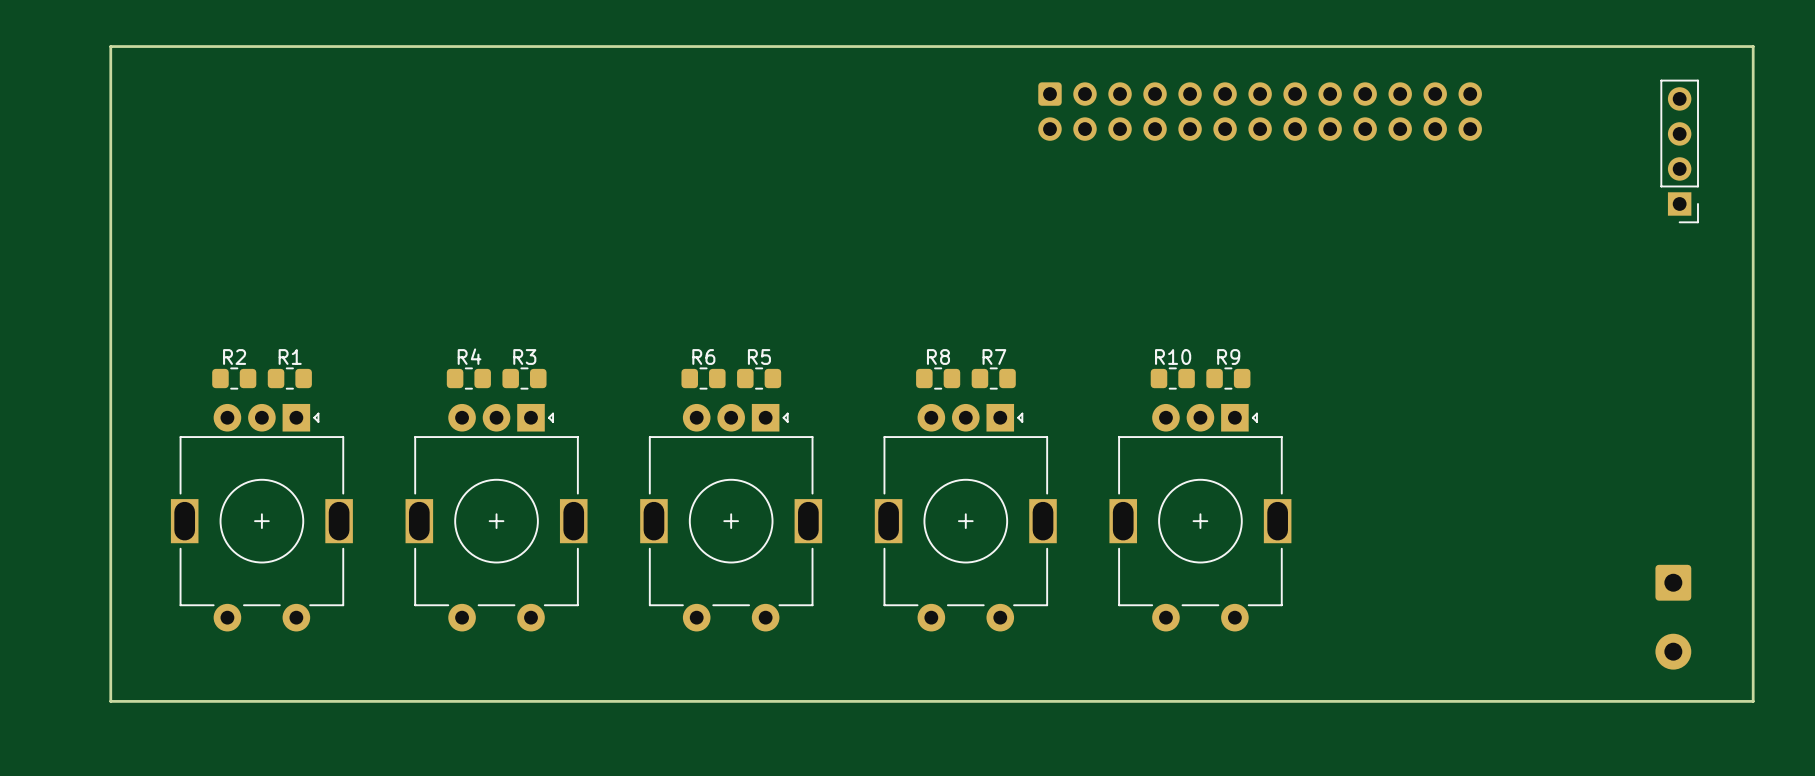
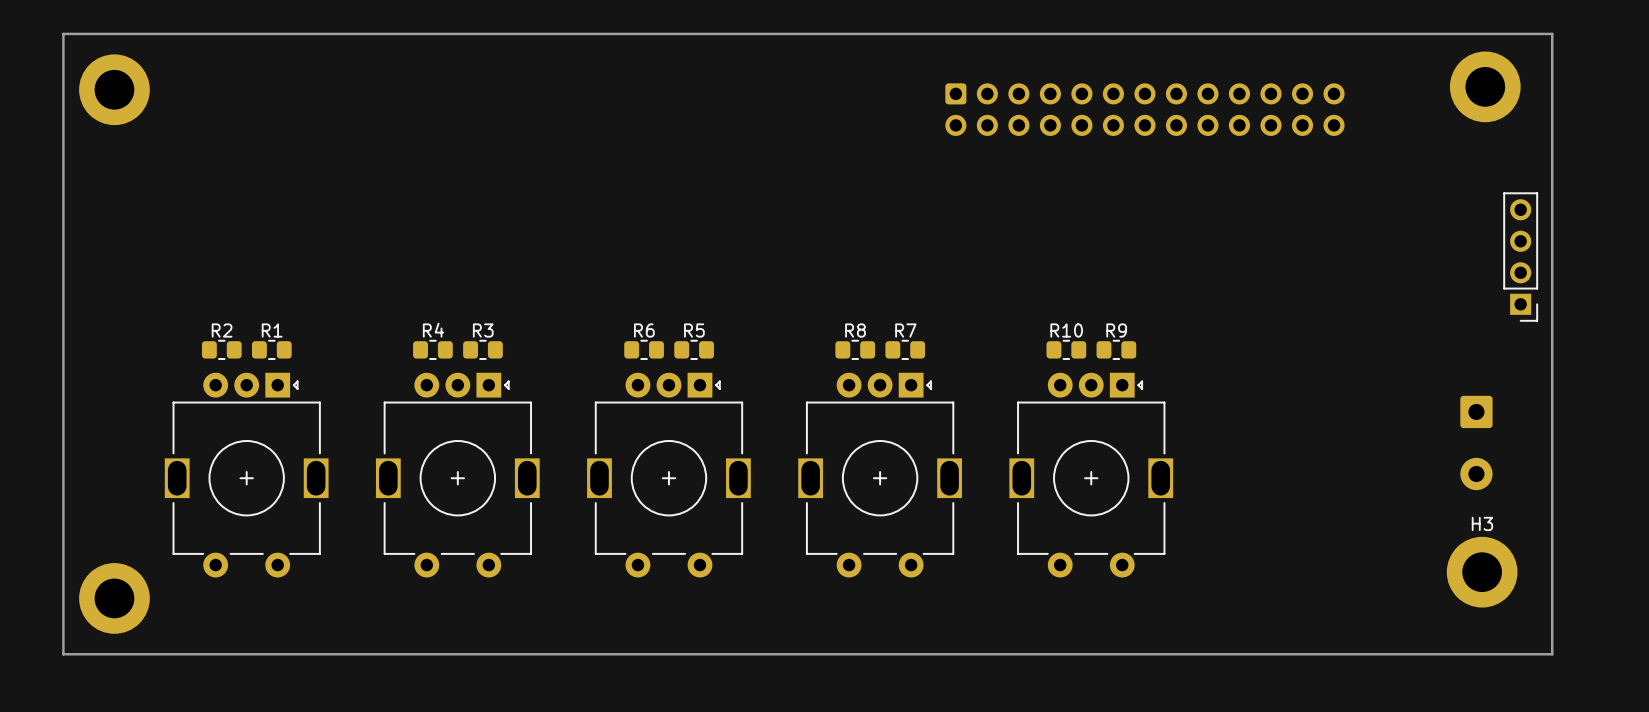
board edge: (110, 46) (1753, 46) (1753, 701) (110, 701) (110, 46) -> (63, 33) (63, 654) (1552, 654) (1552, 33) (63, 33)
part: none -> (1485, 86)
part: none -> (114, 89)
part position: (1679, 151) -> (1520, 257)
part position: (1673, 617) -> (1476, 442)
H3: none -> (1482, 572)
part: none -> (114, 598)

